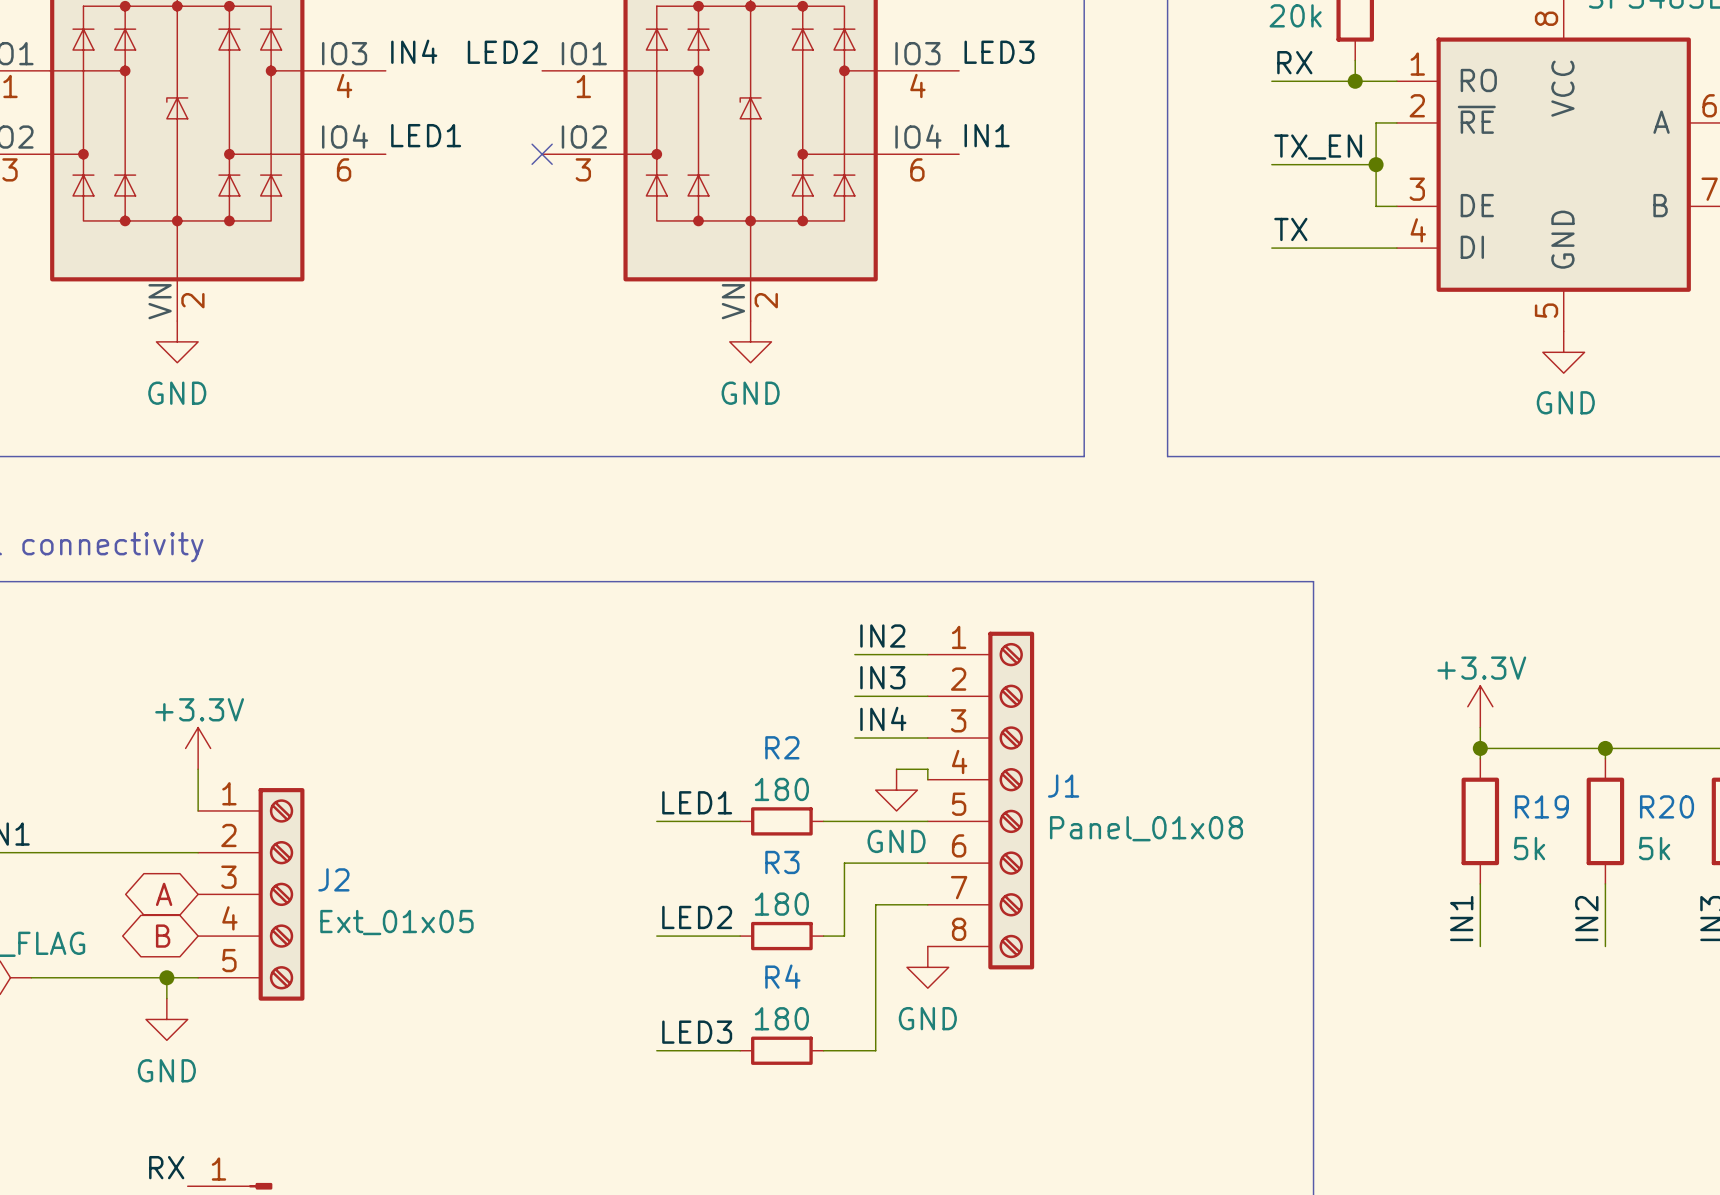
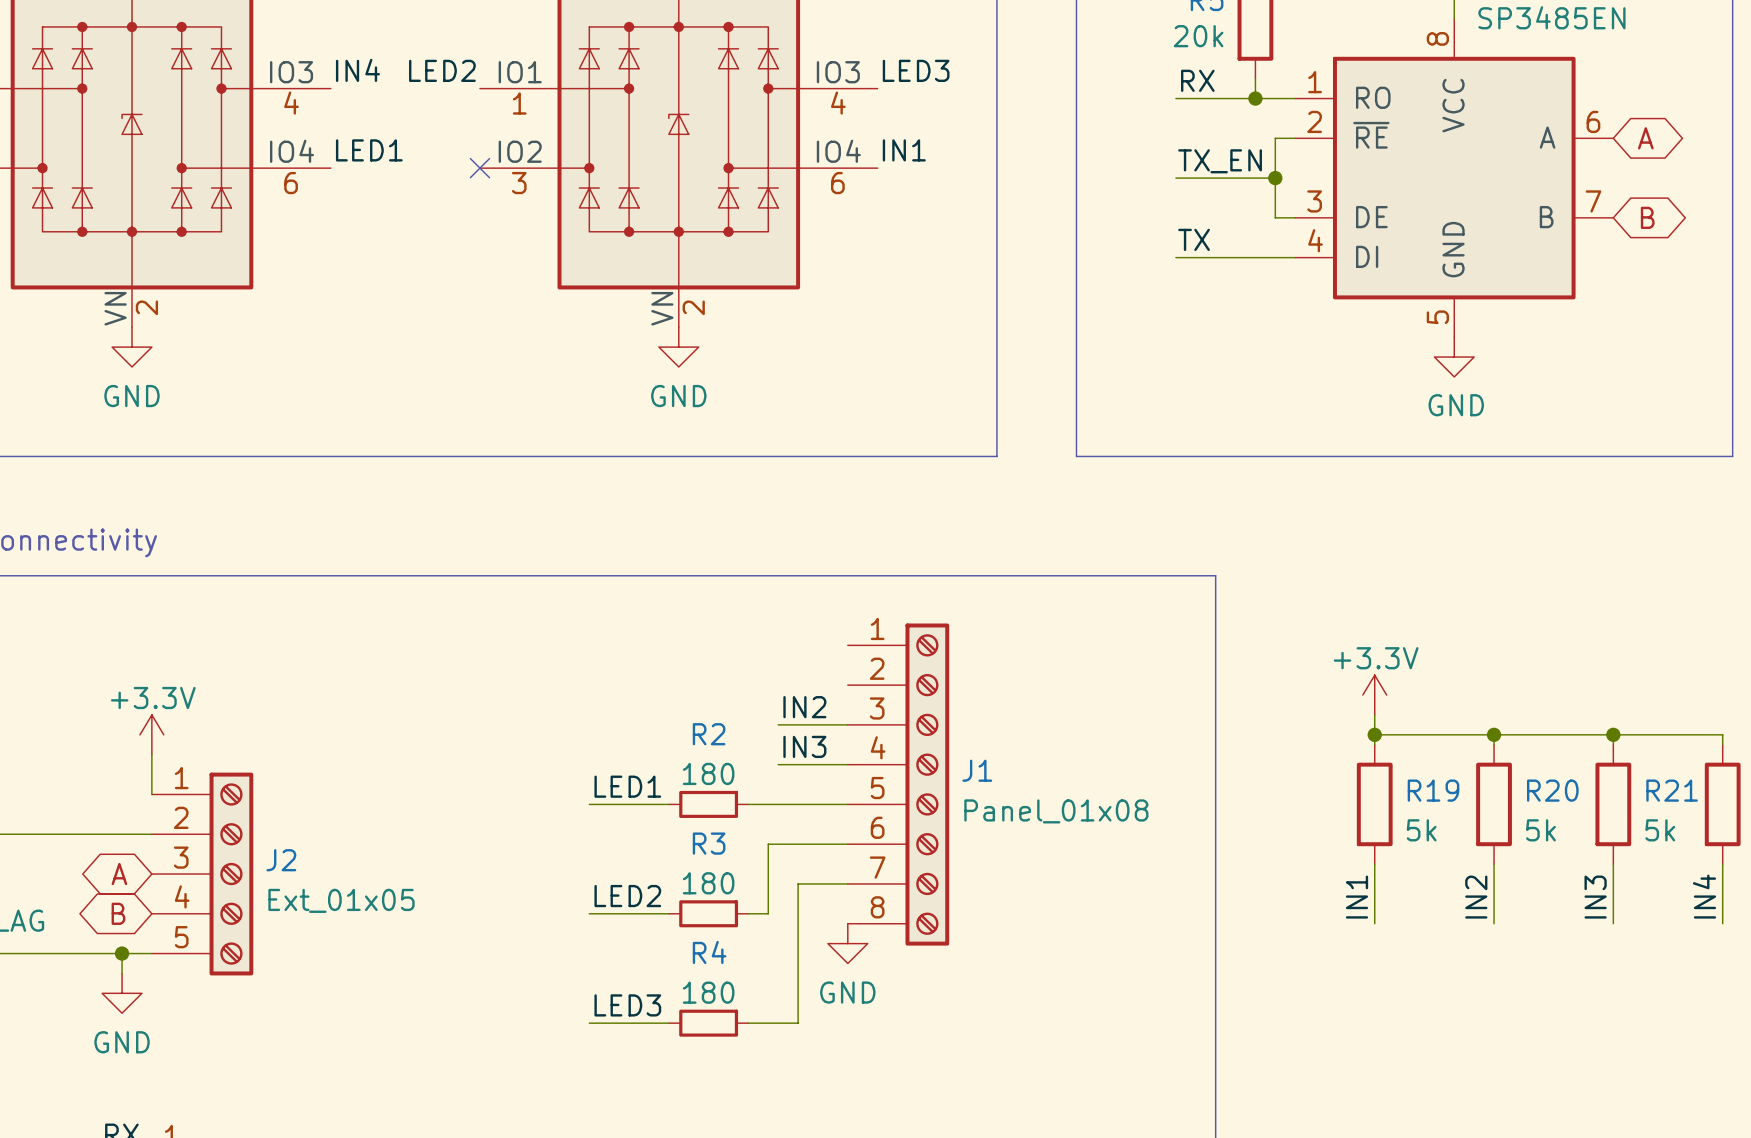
label: IN2 (882, 636) -> none
wire: (854, 654) (927, 654) -> none
label position: IN3 (882, 677) -> IN3 (804, 746)
wire: (854, 696) (927, 696) -> none
label: IN4 (883, 718) -> IN2 (804, 707)
wire: (896, 769) (927, 769) (927, 779) -> (778, 764) (847, 764)
power symbol: GND (896, 790) -> none

